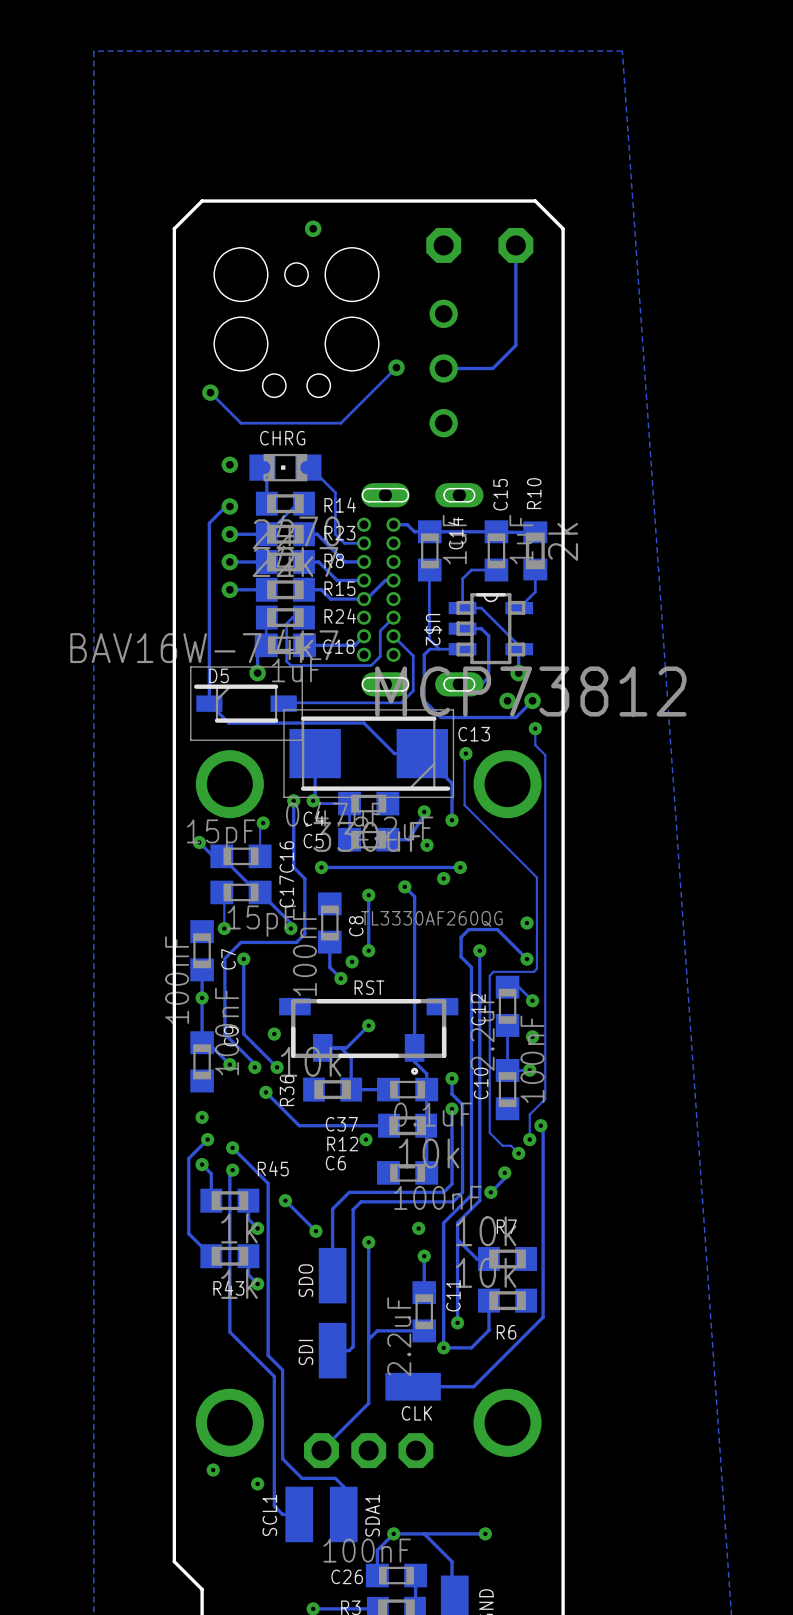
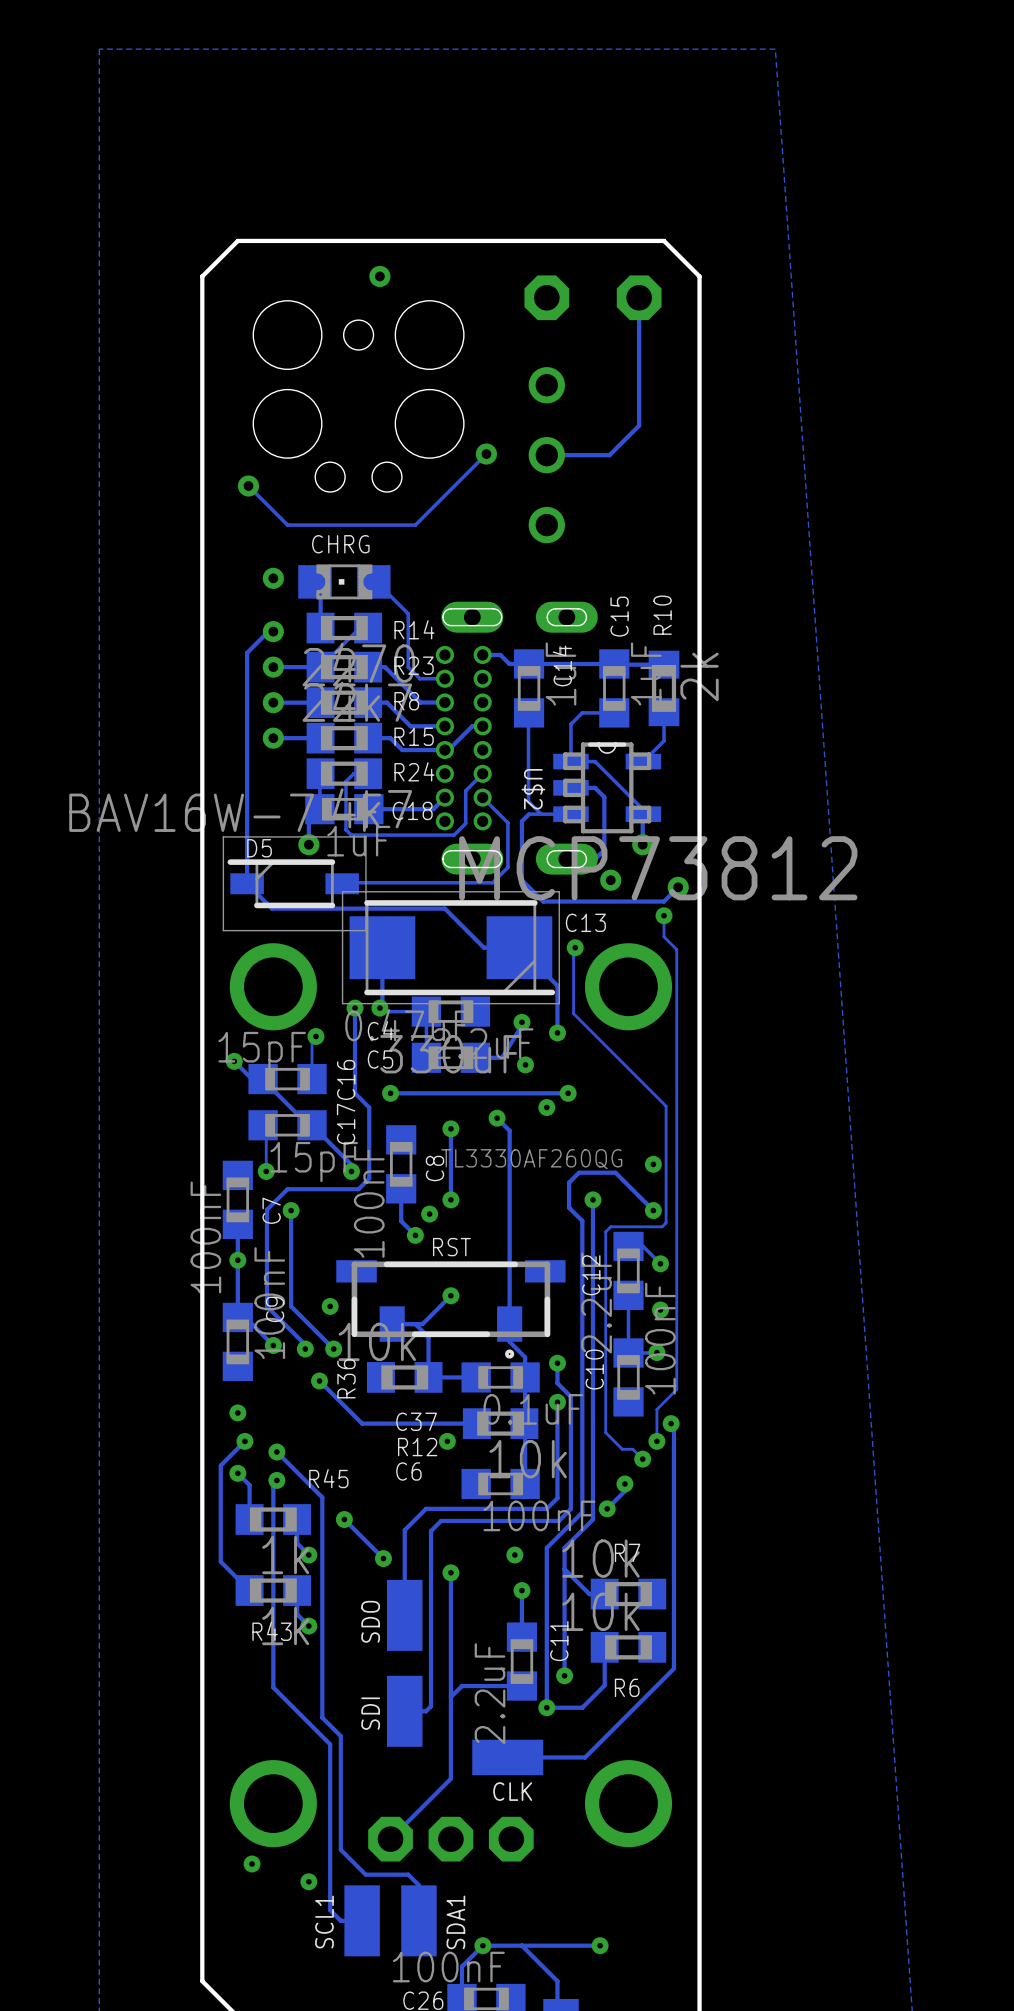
via position: (507, 700) -> (610, 880)
track: (532, 700) (515, 717) -> (678, 887) (664, 901) (639, 901)
via position: (532, 700) -> (678, 887)

